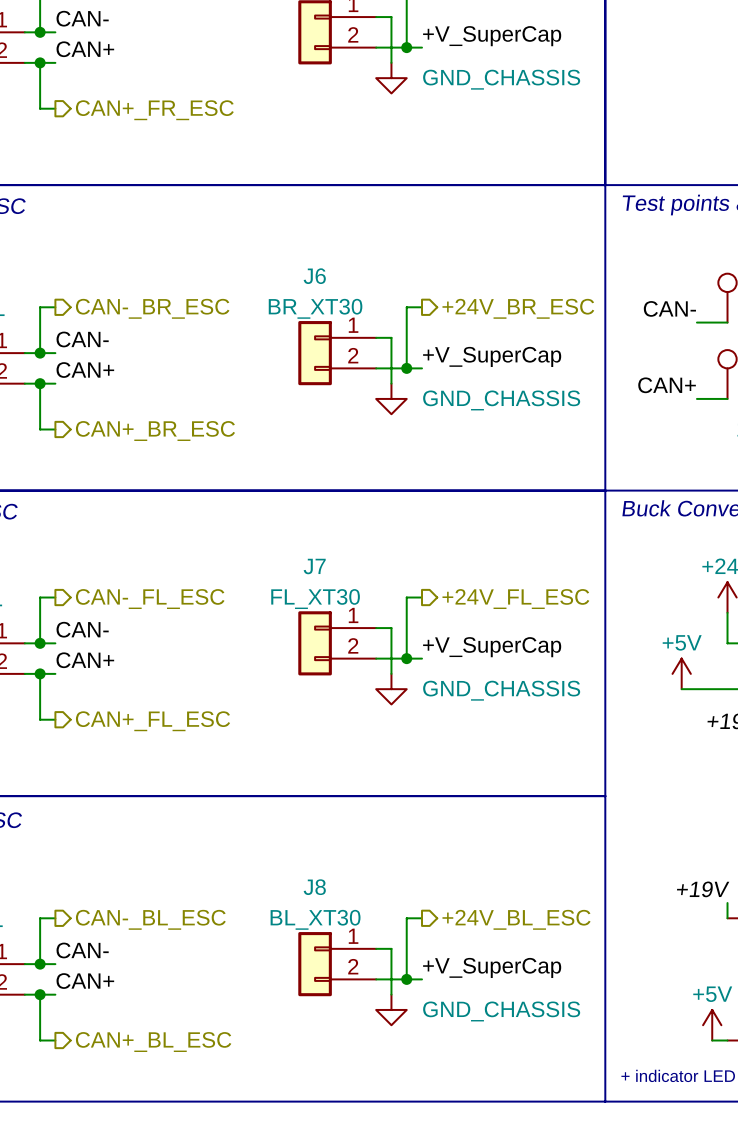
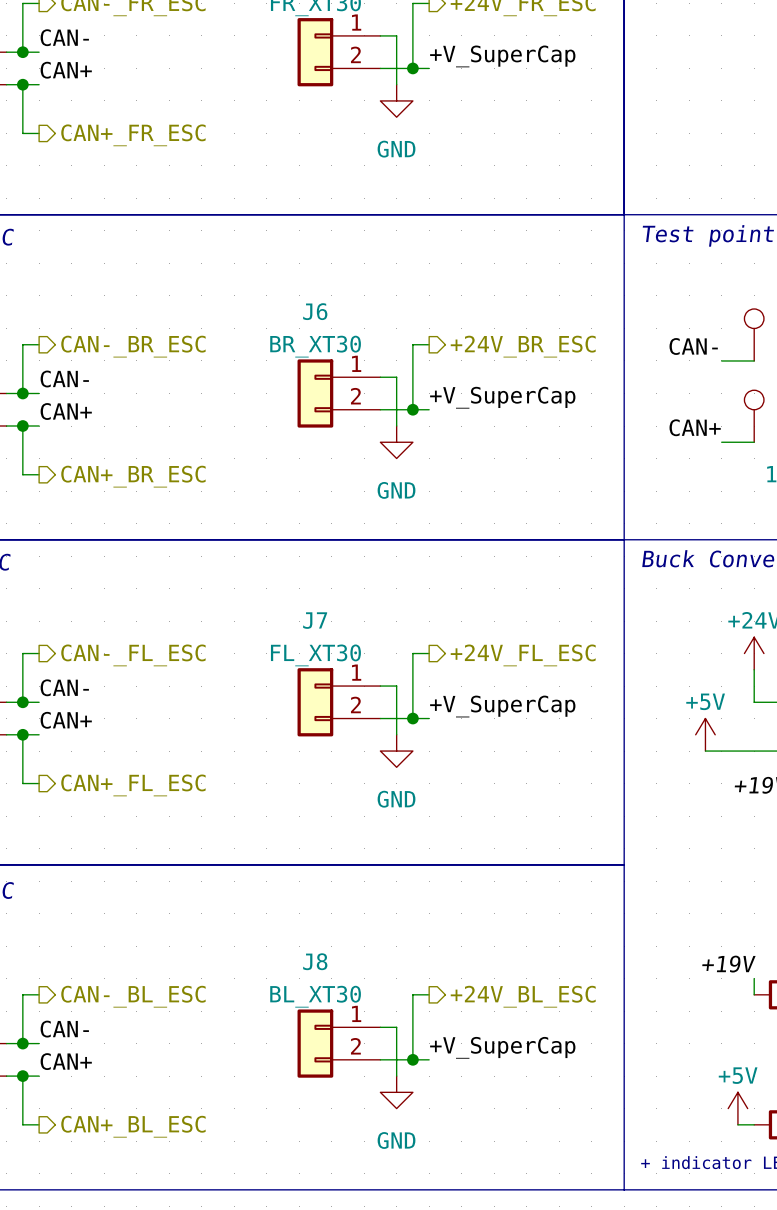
power symbol: GND_CHASSIS (391, 78) -> GND (396, 100)
power symbol: GND_CHASSIS (391, 398) -> GND (396, 442)
power symbol: GND_CHASSIS (391, 689) -> GND (396, 751)
power symbol: GND_CHASSIS (391, 1009) -> GND (396, 1092)

